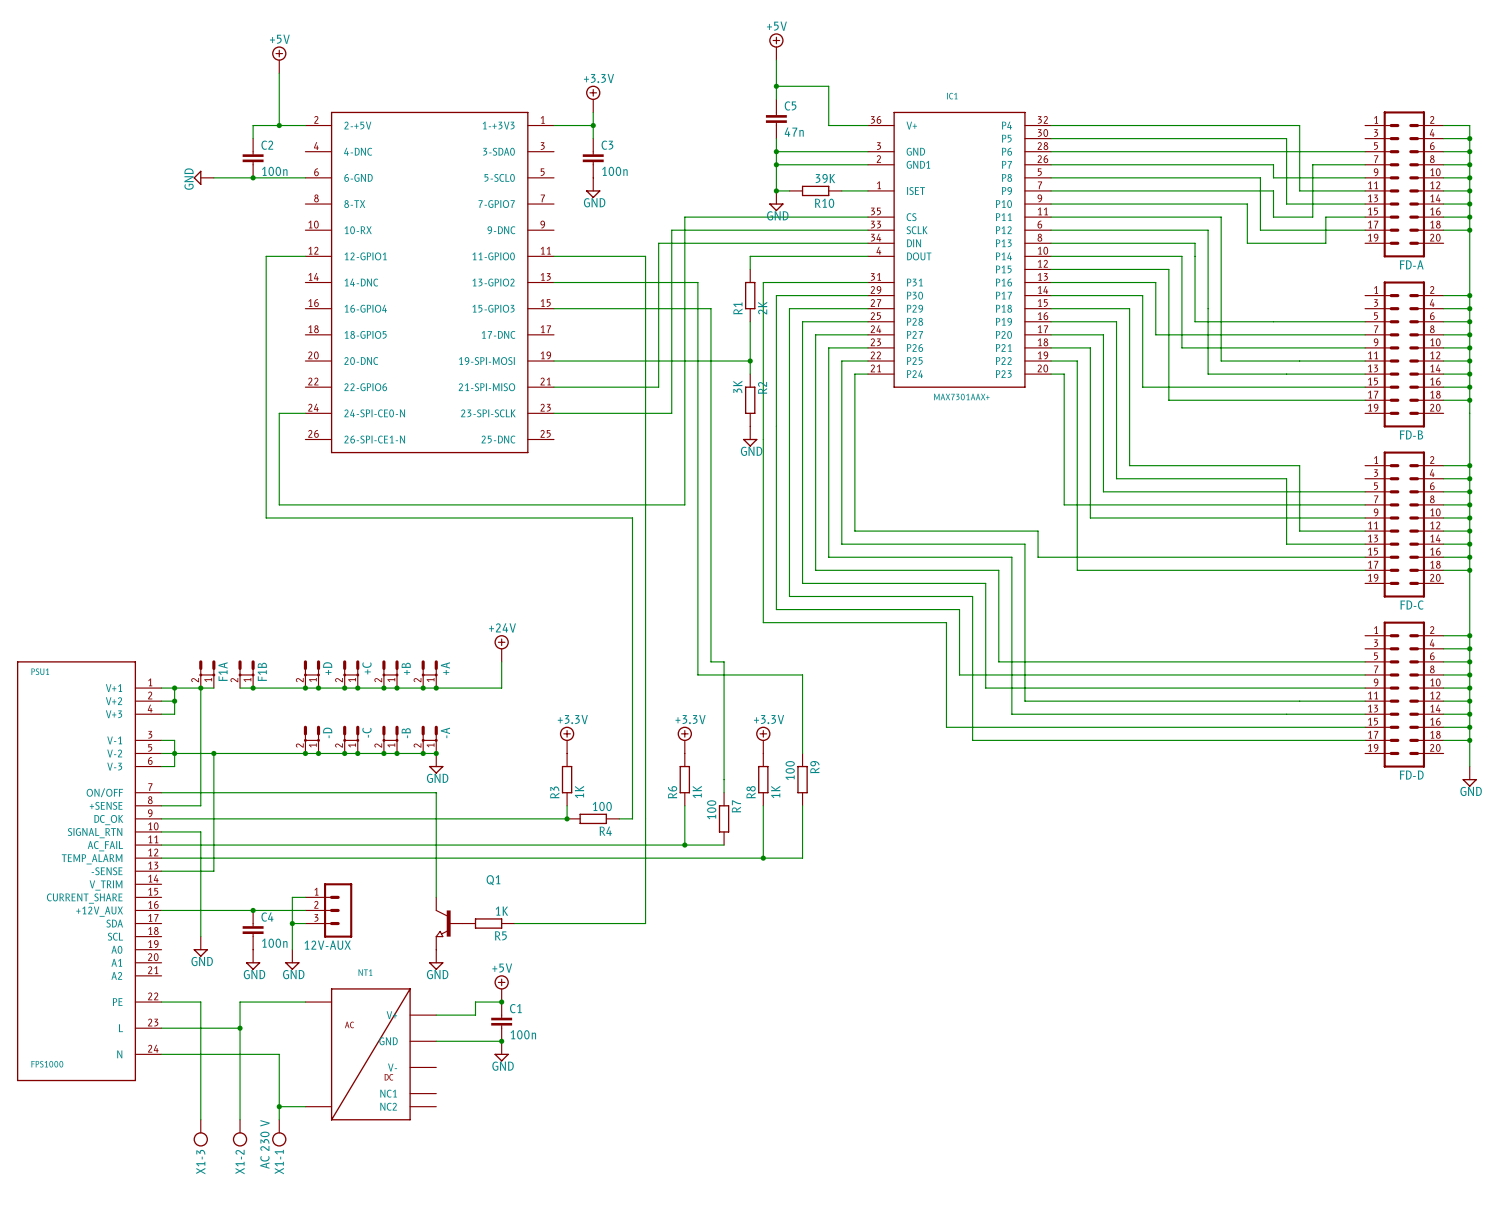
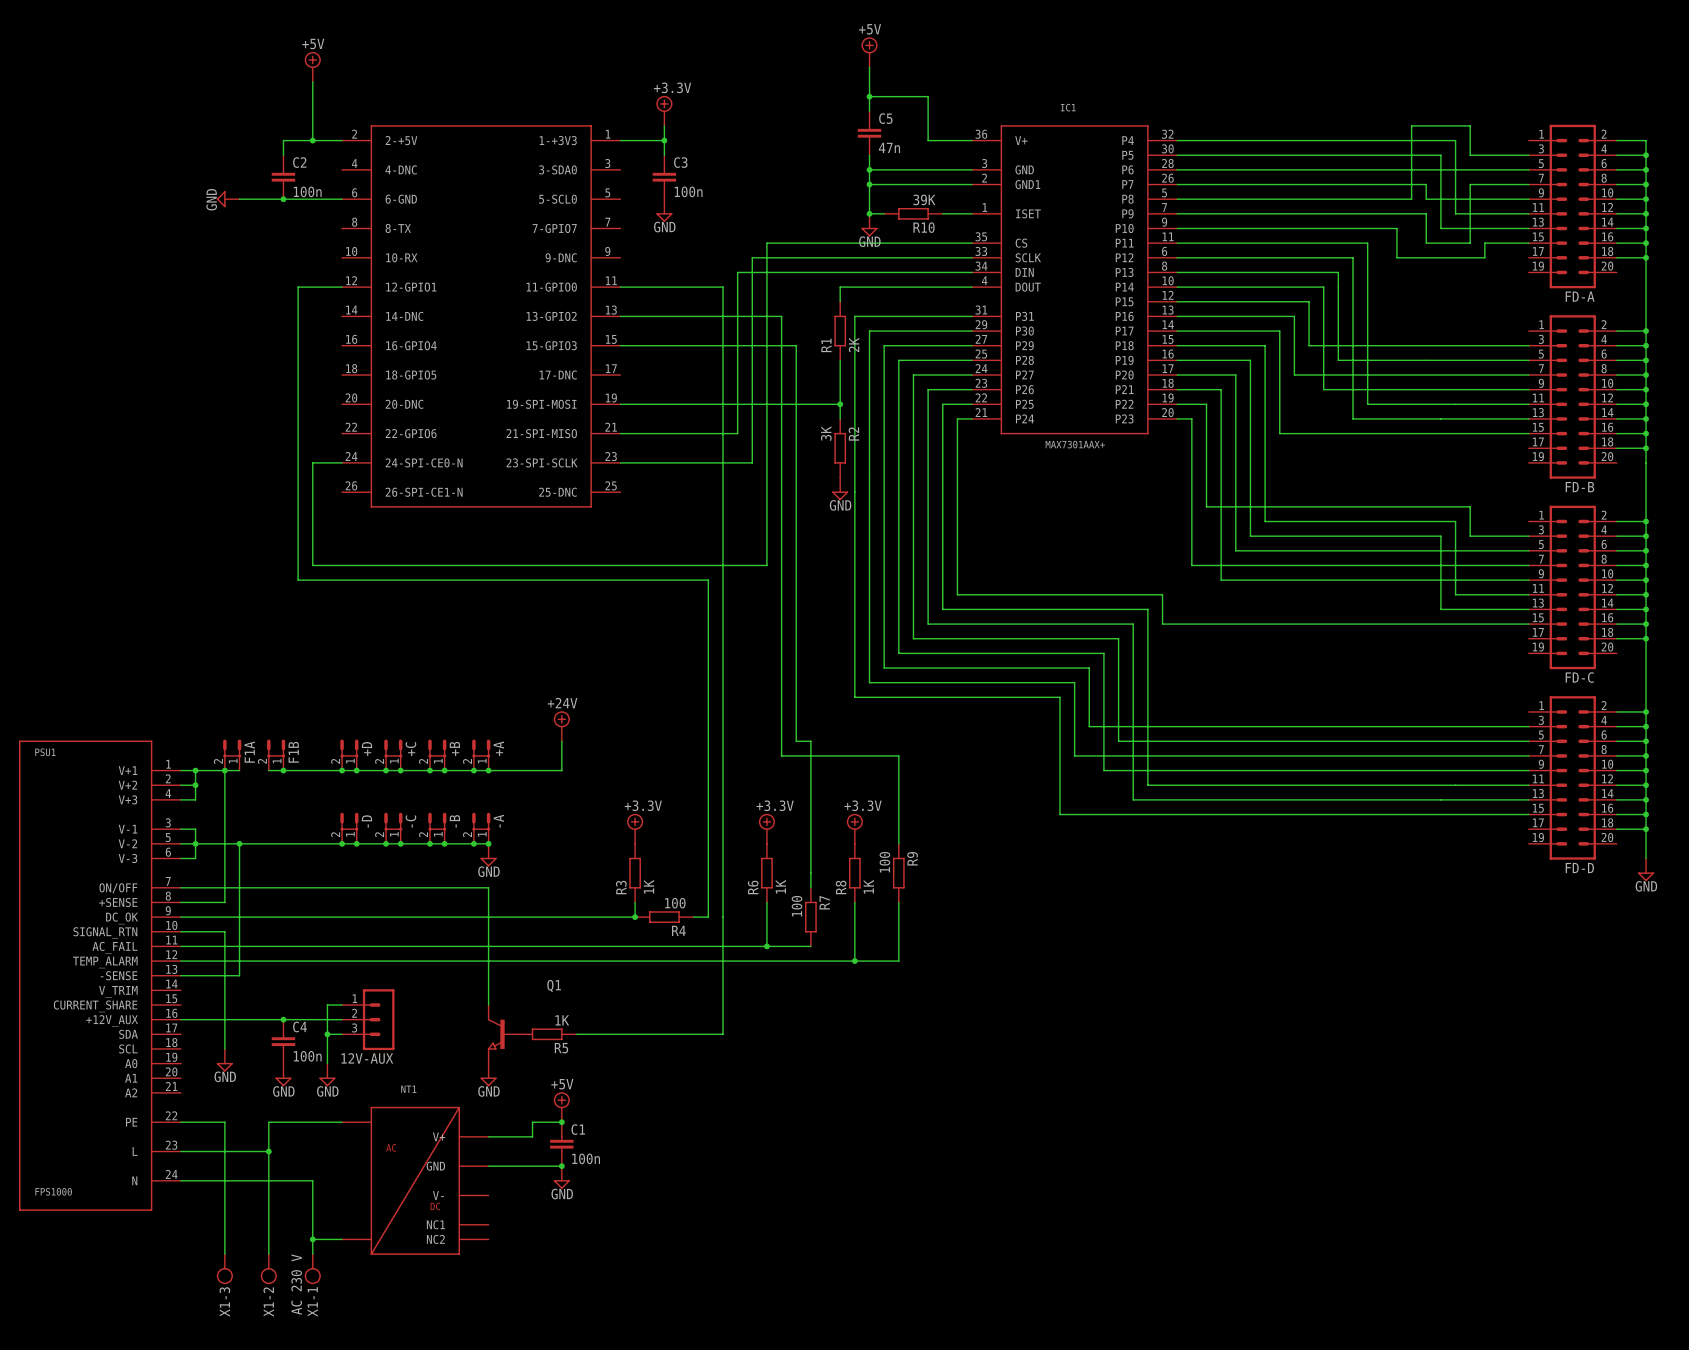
wire: none -> (1528, 155) (1470, 155) (1470, 125) (1411, 125) (1411, 199)
wire: (1260, 177) (1260, 230) -> (1396, 257) (1411, 257)
wire: (1247, 230) (1247, 243) (1325, 243) (1325, 230) (1365, 230) -> none
wire: (1168, 308) (1168, 400) (1365, 400) -> (1309, 345) (1528, 345)
wire: (1077, 452) (1077, 570) (1365, 570) -> (1206, 506) (1470, 506) (1470, 536) (1528, 536)
wire: (972, 648) (972, 740) (1365, 740) -> (1089, 726) (1528, 726)

